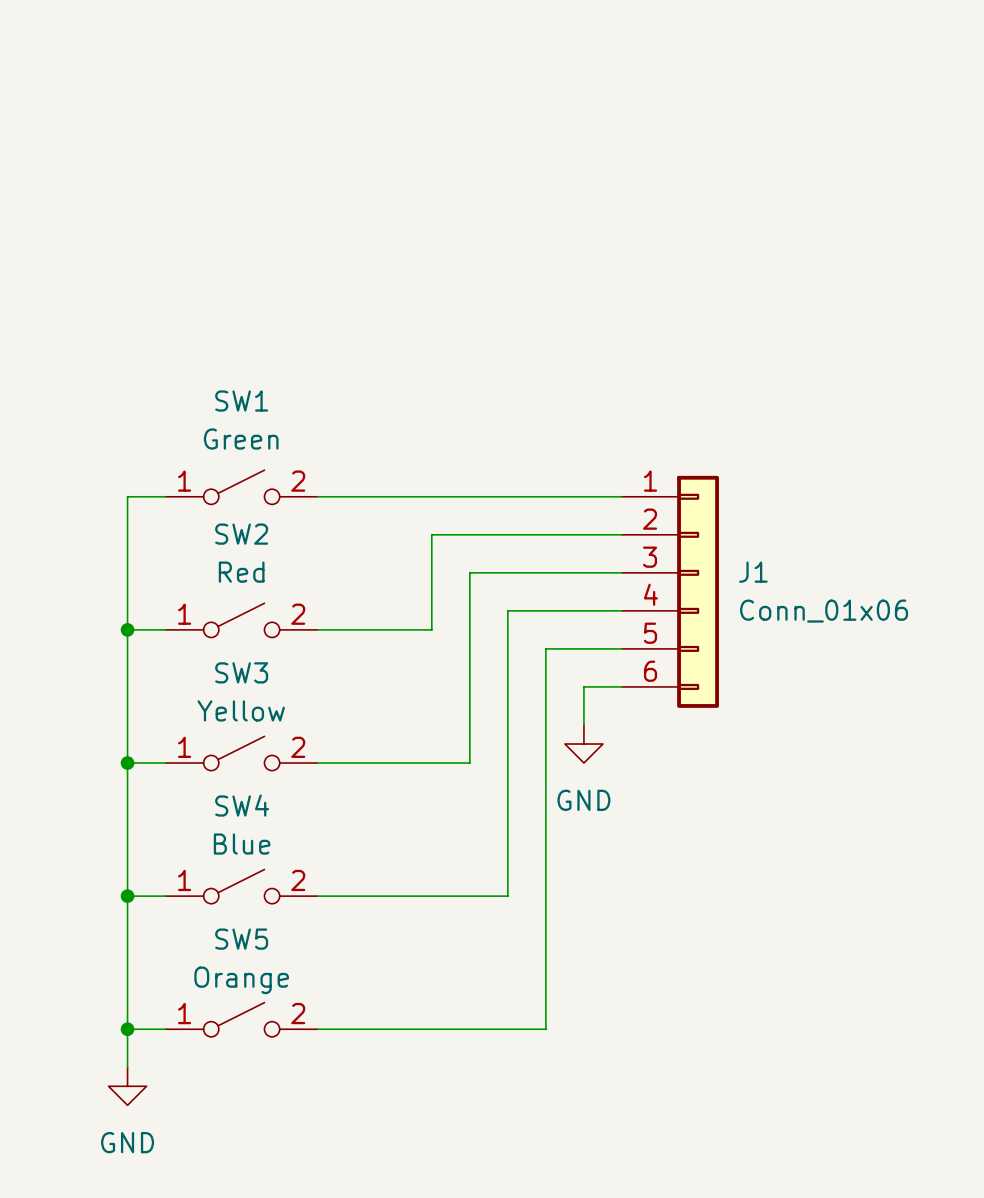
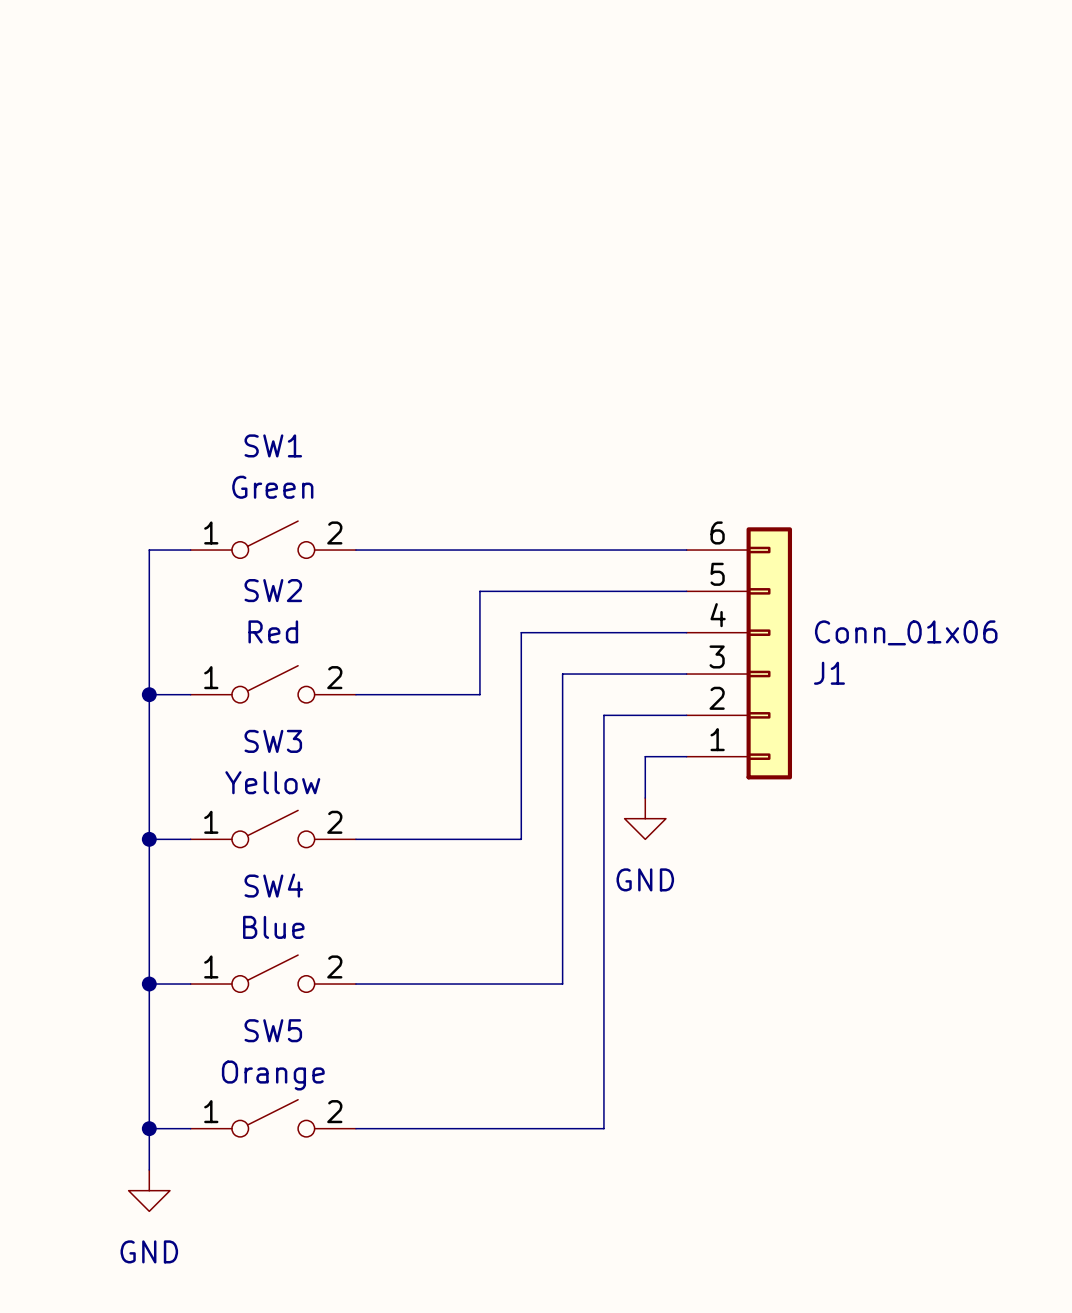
J1 flip: as is (698, 591) -> up-down (769, 653)

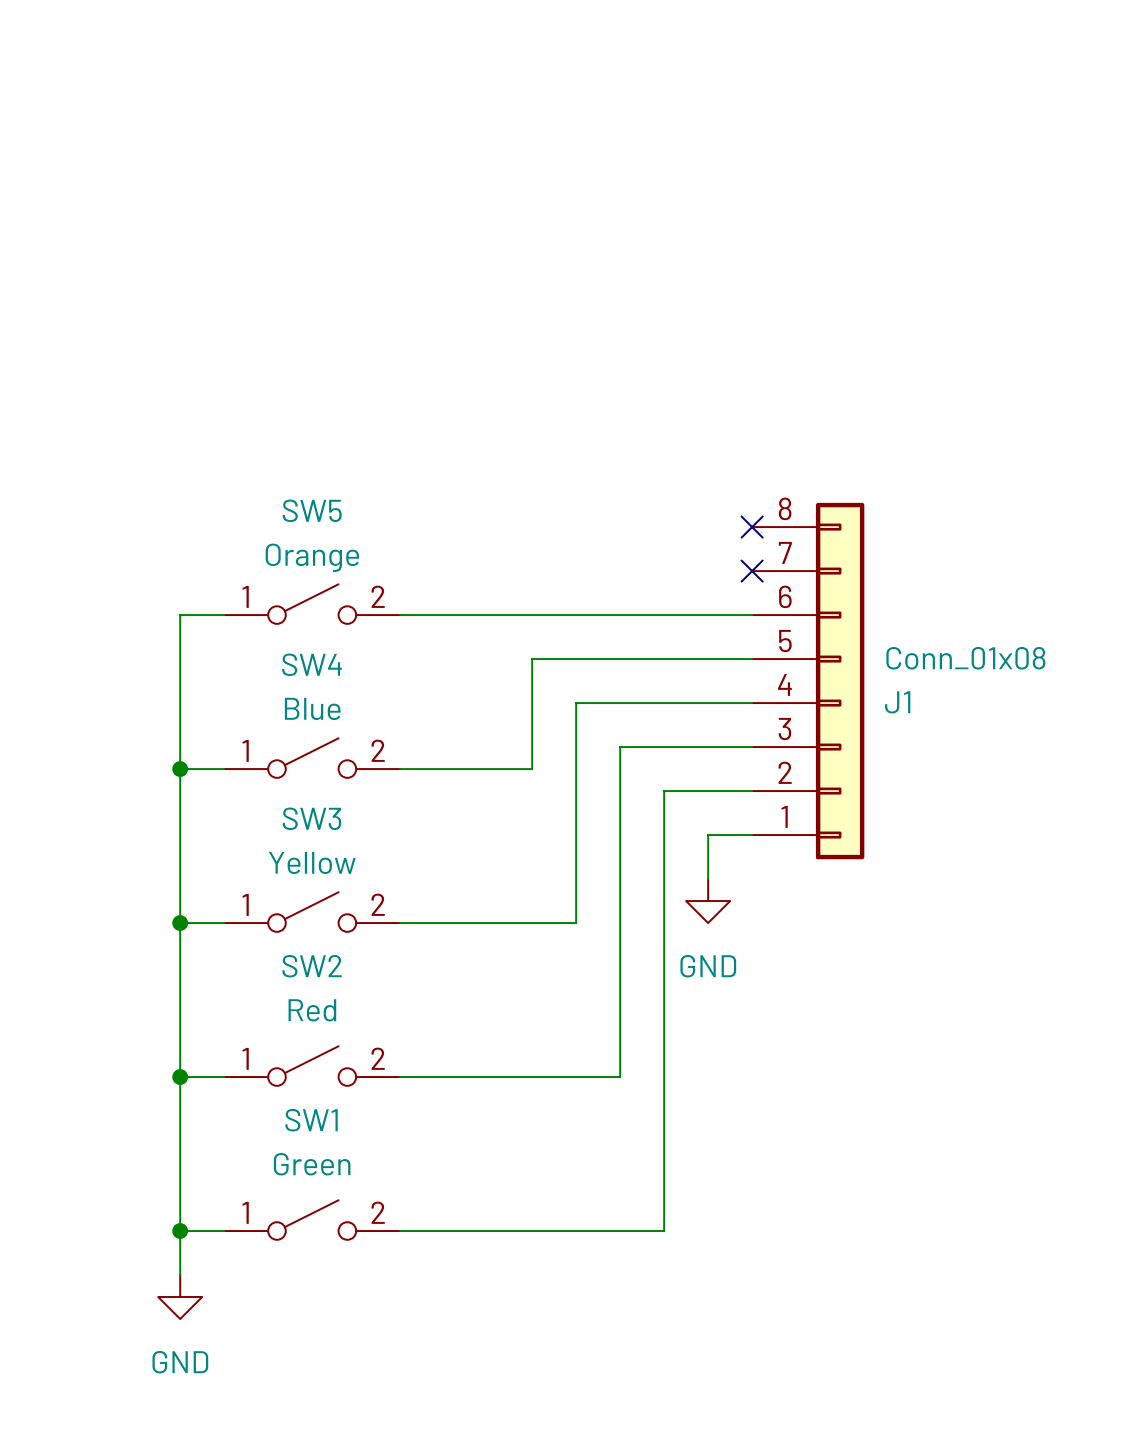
SW1 name: SW1 (273, 445) -> SW5 (312, 510)
no-connect mark: none -> (752, 527)
SW1 value: Green (272, 487) -> Orange (312, 557)
no-connect mark: none -> (752, 571)
J1 symbol: [686, 527, 793, 780] -> [752, 502, 865, 860]
SW2 name: SW2 (273, 590) -> SW4 (312, 664)
SW2 value: Red (273, 631) -> Blue (312, 708)
J1 value: Conn_01x06 (906, 632) -> Conn_01x08 (965, 658)
SW4 name: SW4 (273, 885) -> SW2 (312, 966)
SW4 value: Blue (273, 927) -> Red (312, 1010)
SW5 name: SW5 (273, 1030) -> SW1 (311, 1120)
SW5 value: Orange (273, 1075) -> Green (312, 1164)

